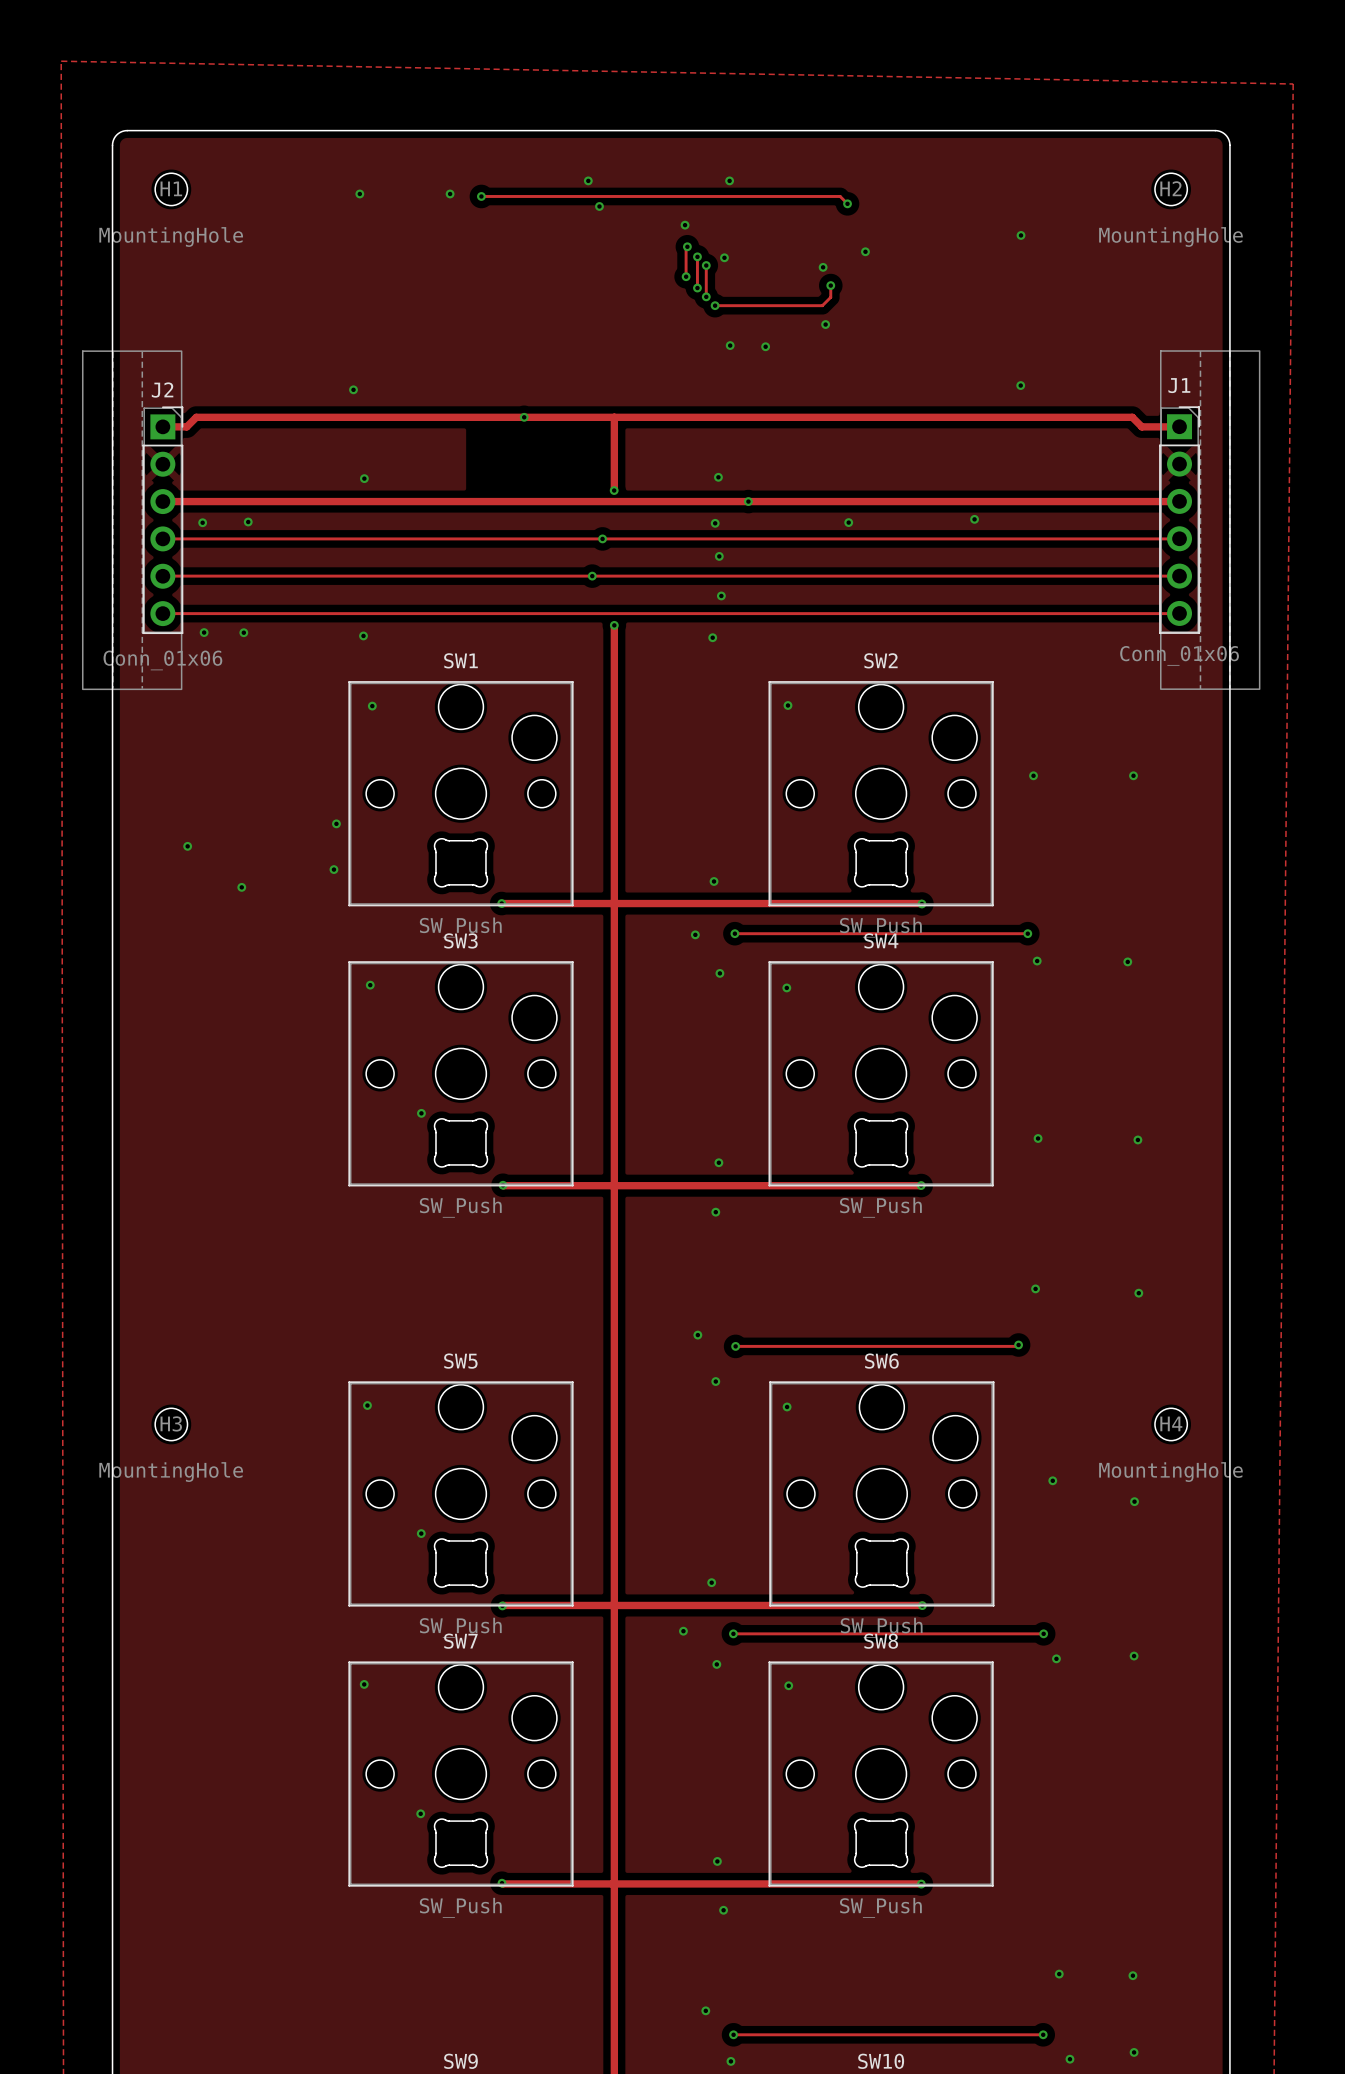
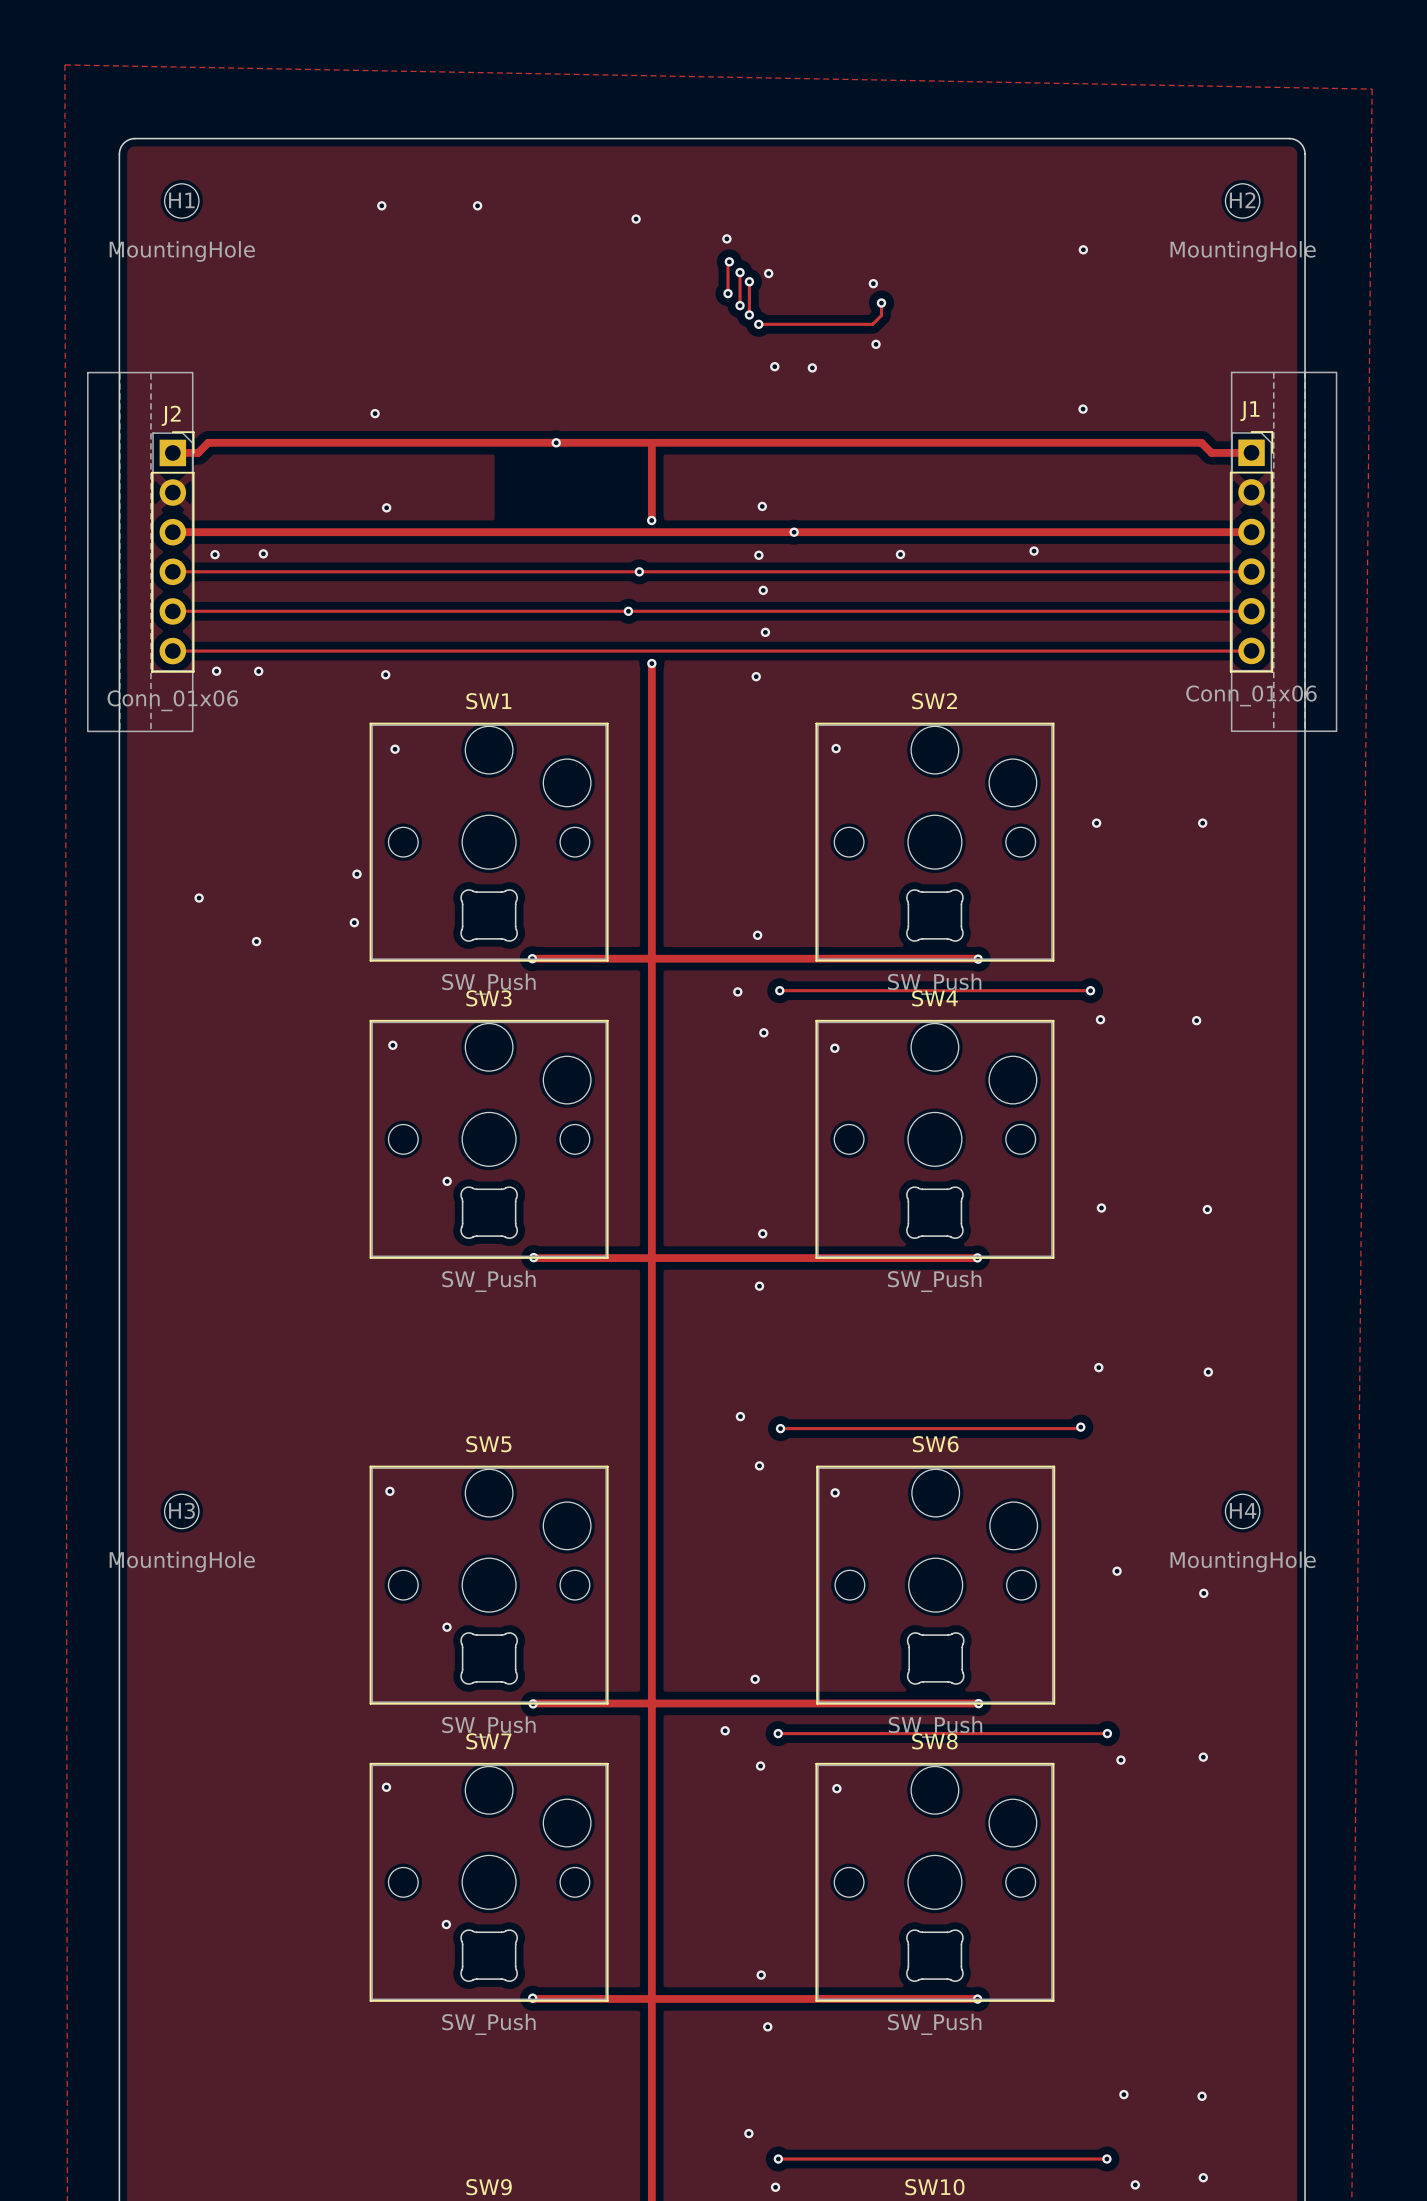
via: (588, 180) -> none
via: (729, 180) -> none
track: (481, 196) (840, 196) (847, 203) -> none
via: (481, 196) -> none
via: (847, 203) -> none
via: (865, 251) -> none

